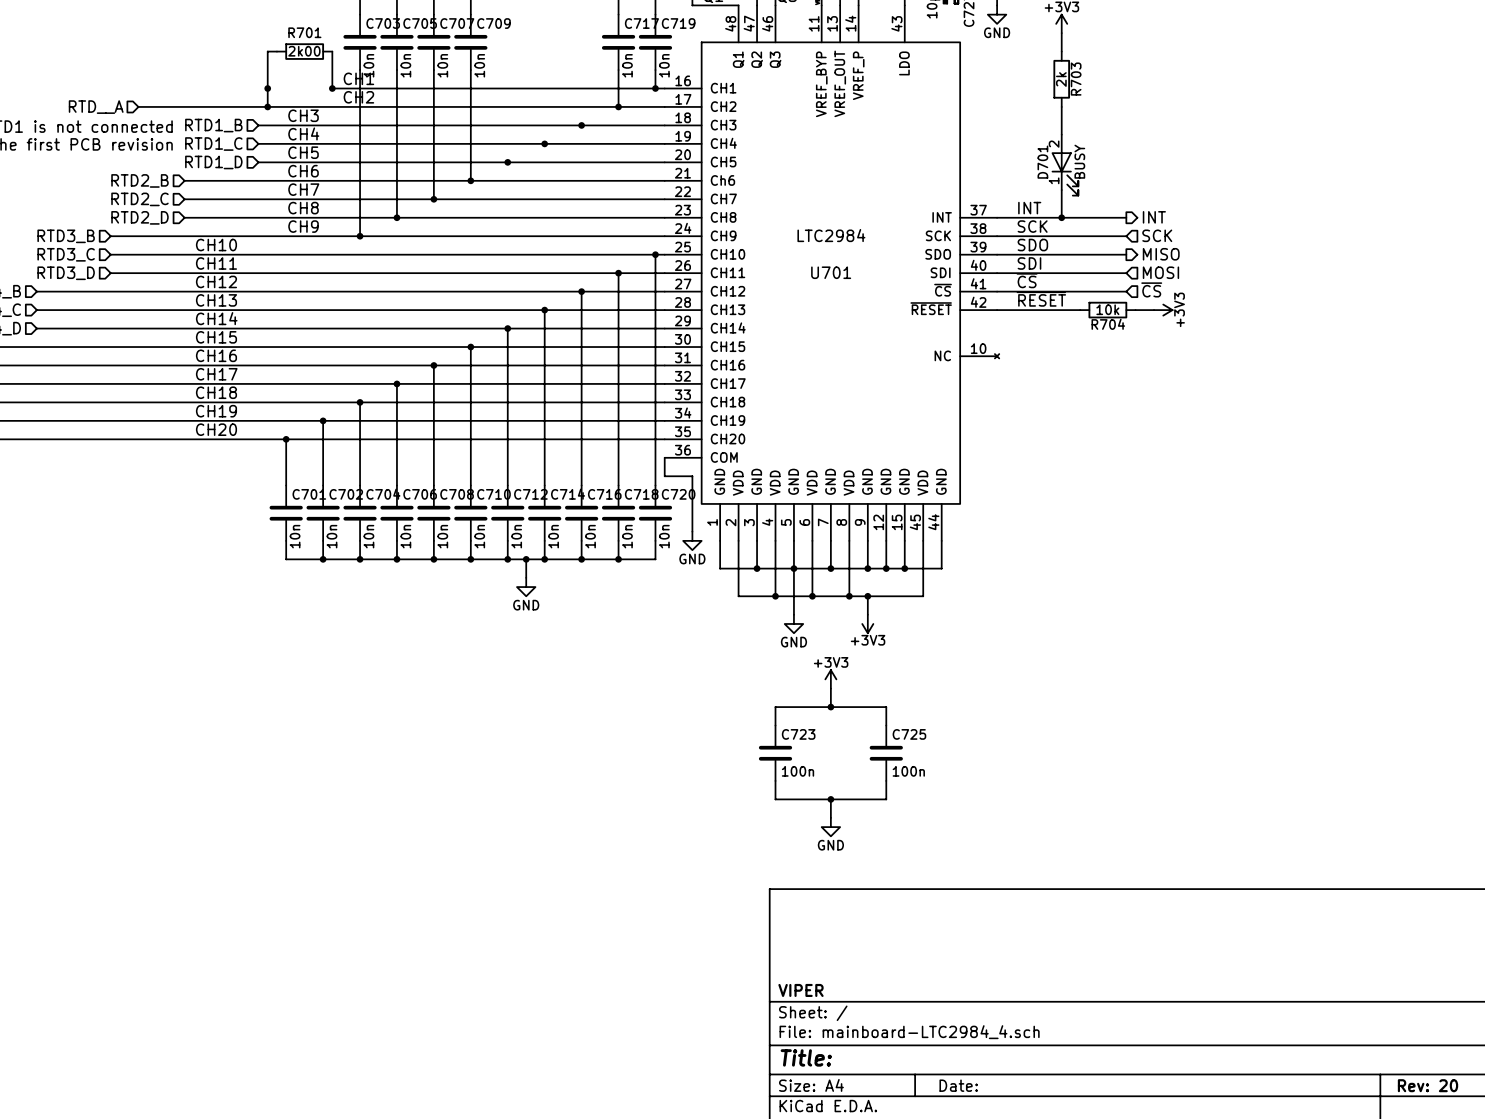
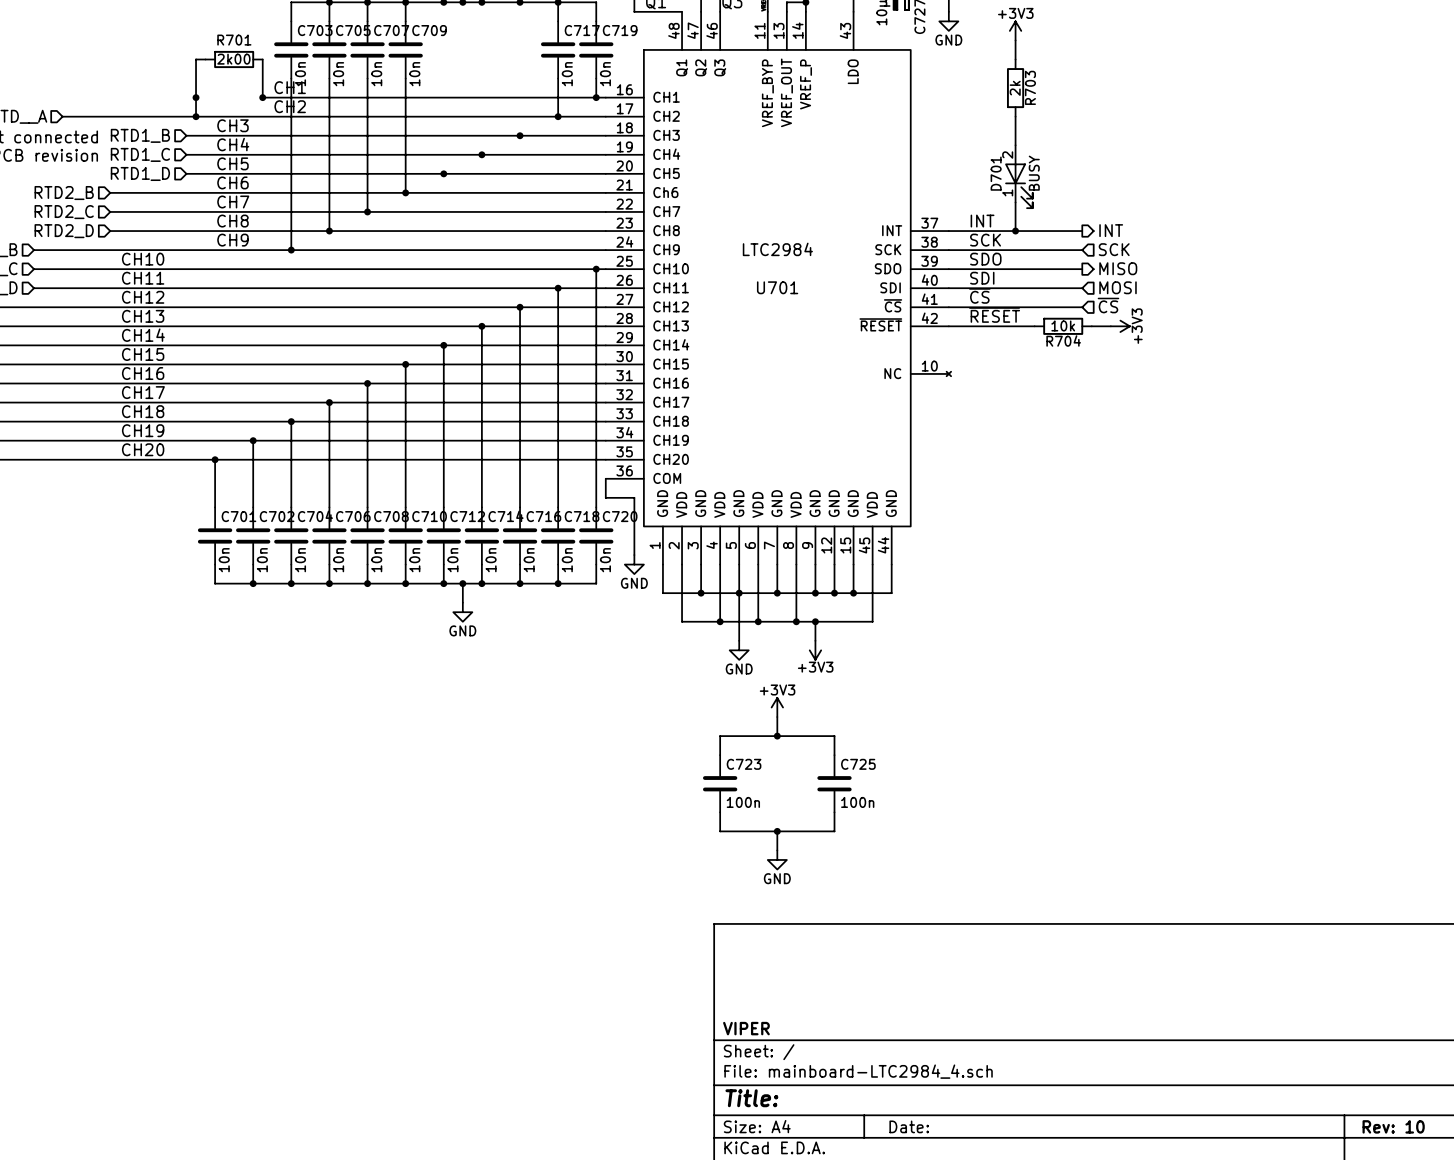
title block: Rev: 20 (1428, 1085) -> Rev: 10 (1393, 1126)

